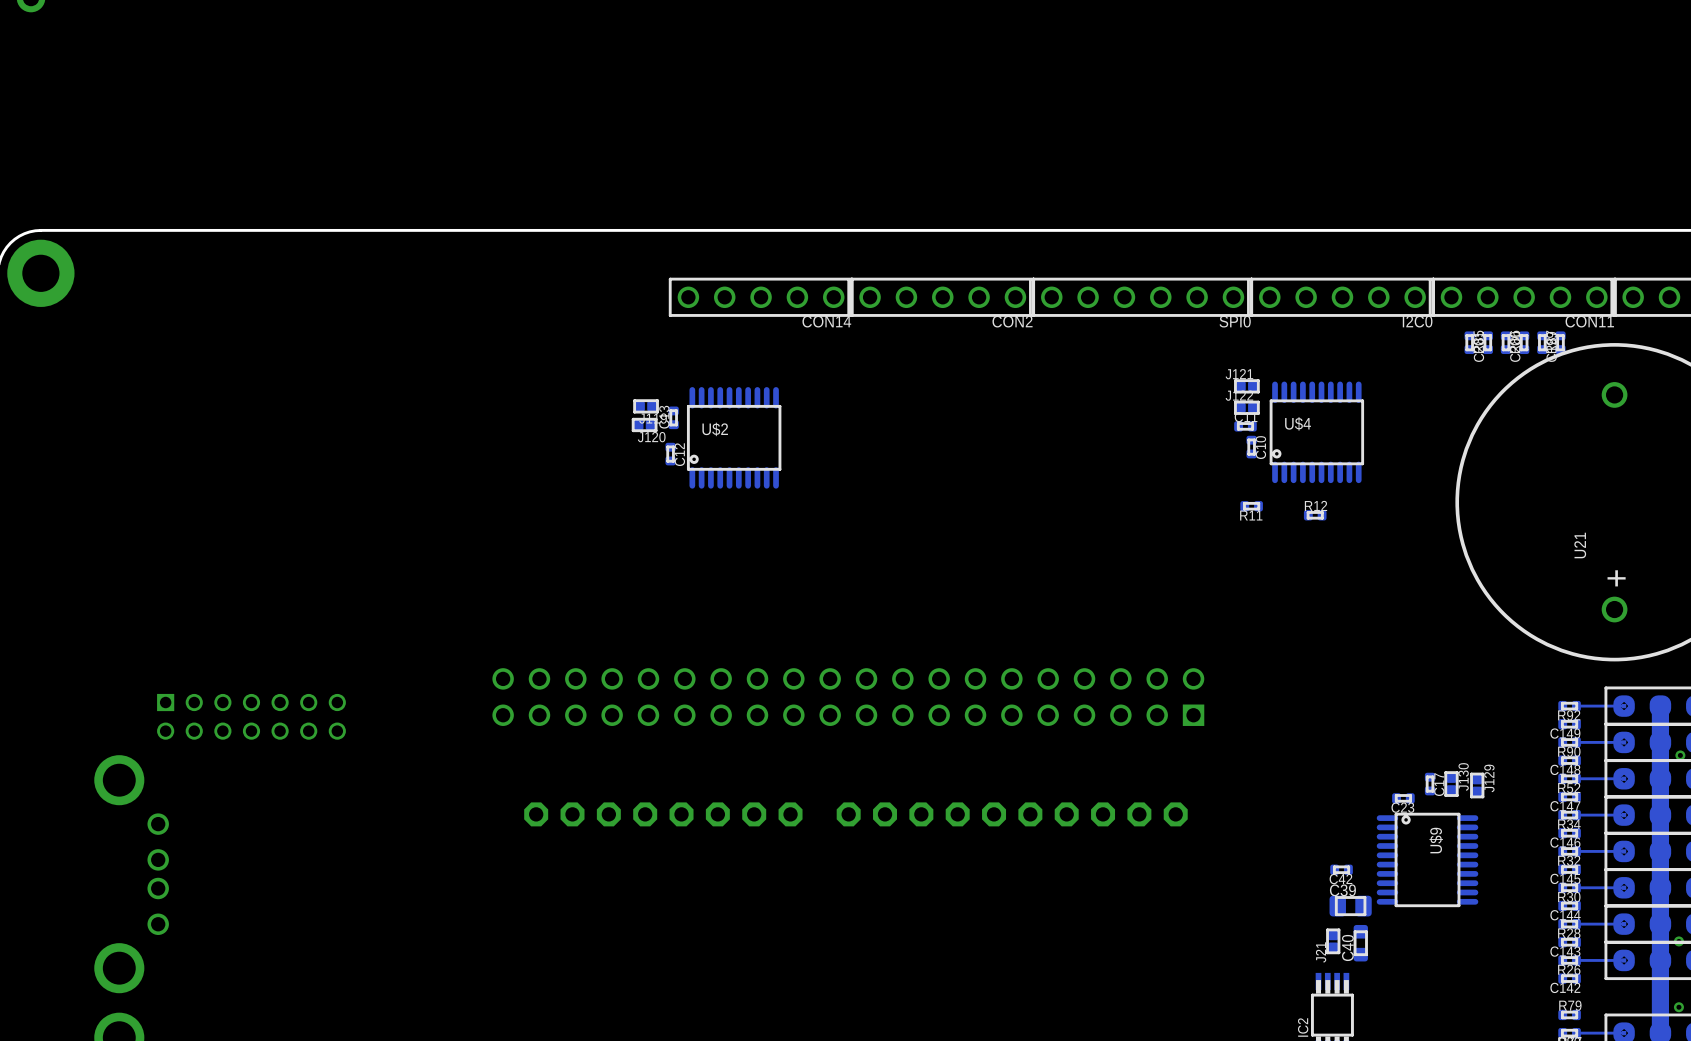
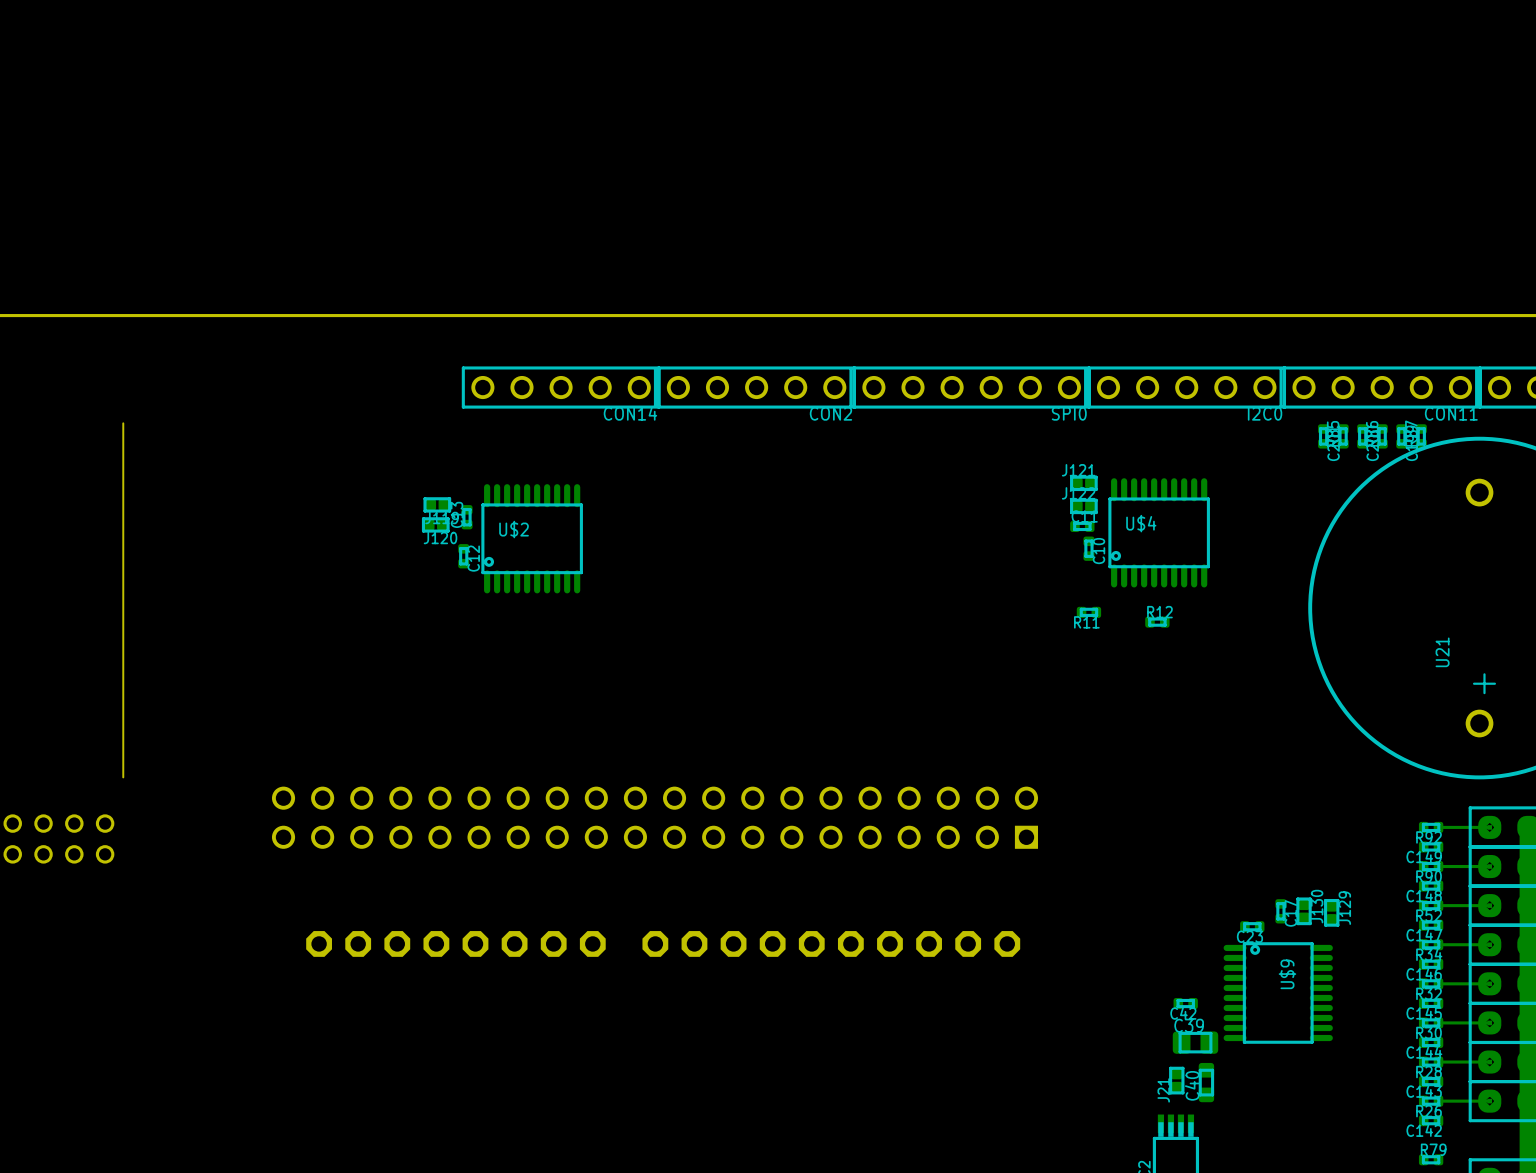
part: none -> (123, 600)

